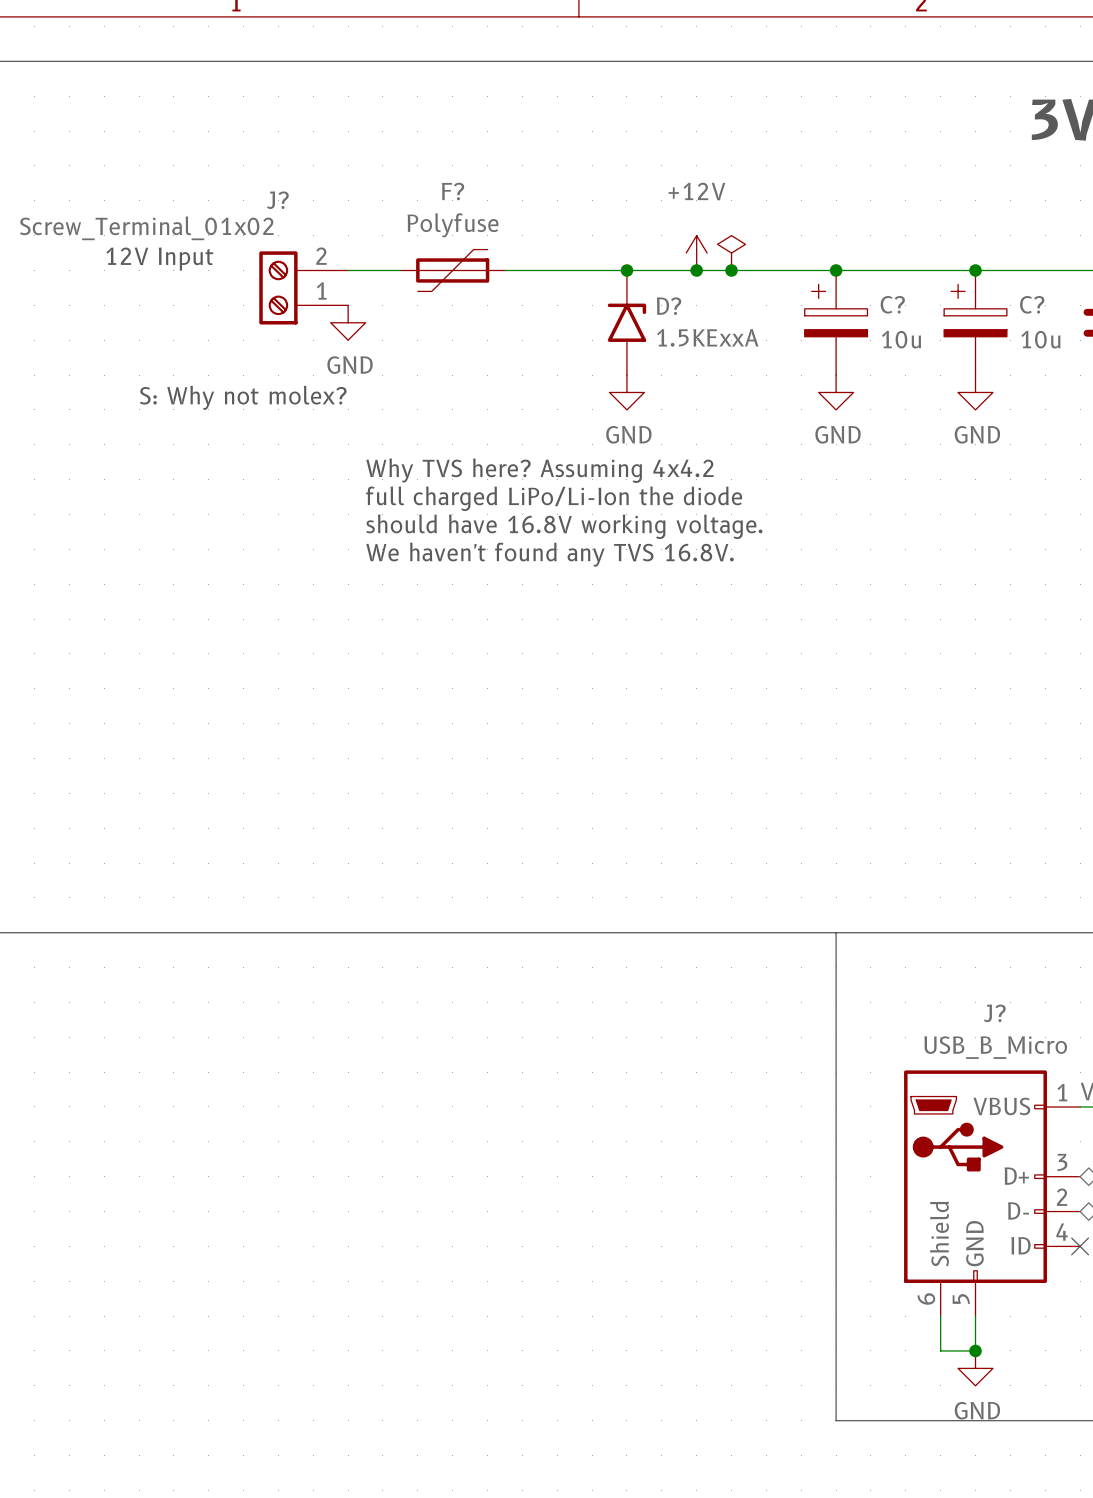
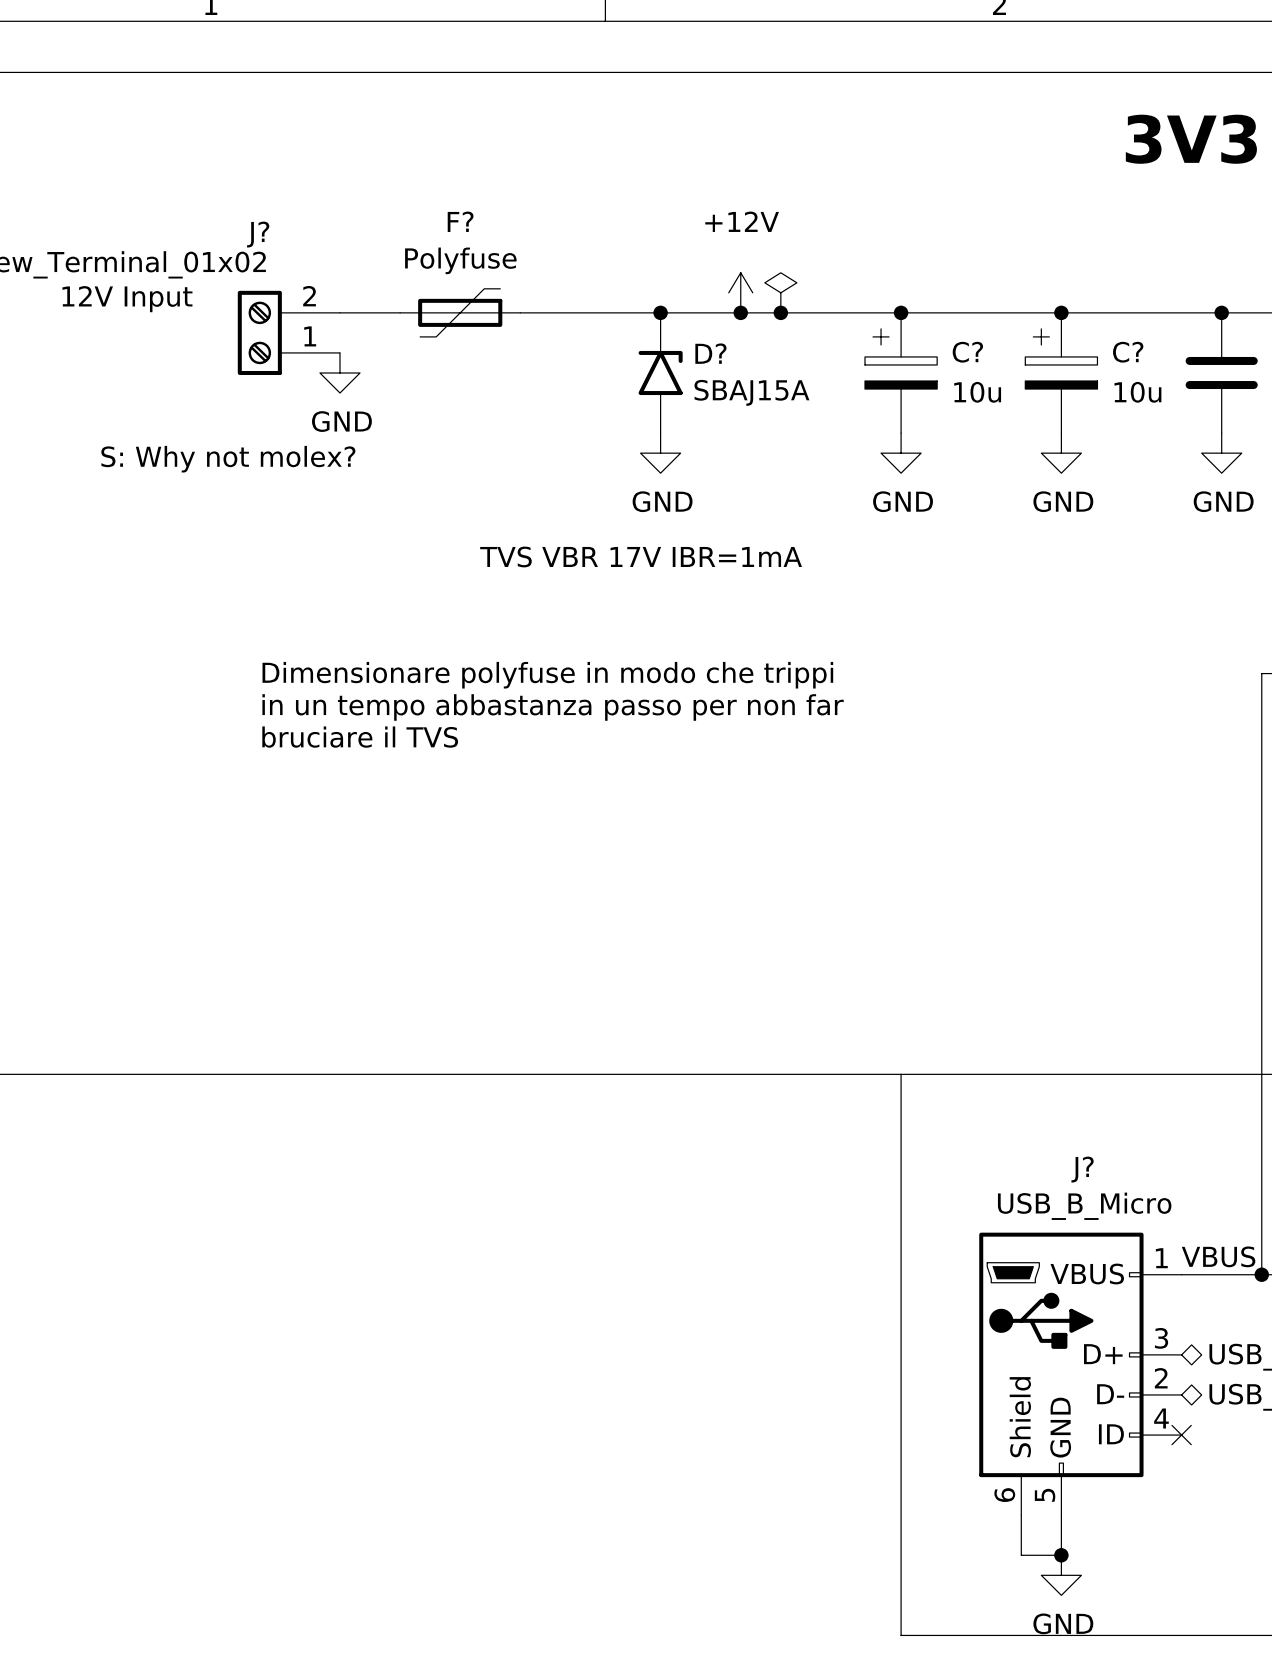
D? value: 1.5KExxA (707, 337) -> SBAJ15A (751, 392)
text: Why TVS here? Assuming 4x4.2 (539, 470) -> none
text: none -> TVS VBR 17V IBR=1mA (641, 556)
text: full charged LiPo/Li-Ion the diode (554, 498) -> none
text: should have 16.8V working voltage. (564, 526) -> none
text: We haven't found any TVS 16.8V. (550, 554) -> none
text: none -> Dimensionare polyfuse in modo che trippi (547, 675)
text: none -> in un tempo abbastanza passo per non far (553, 707)
text: none -> bruciare il TVS (360, 737)

